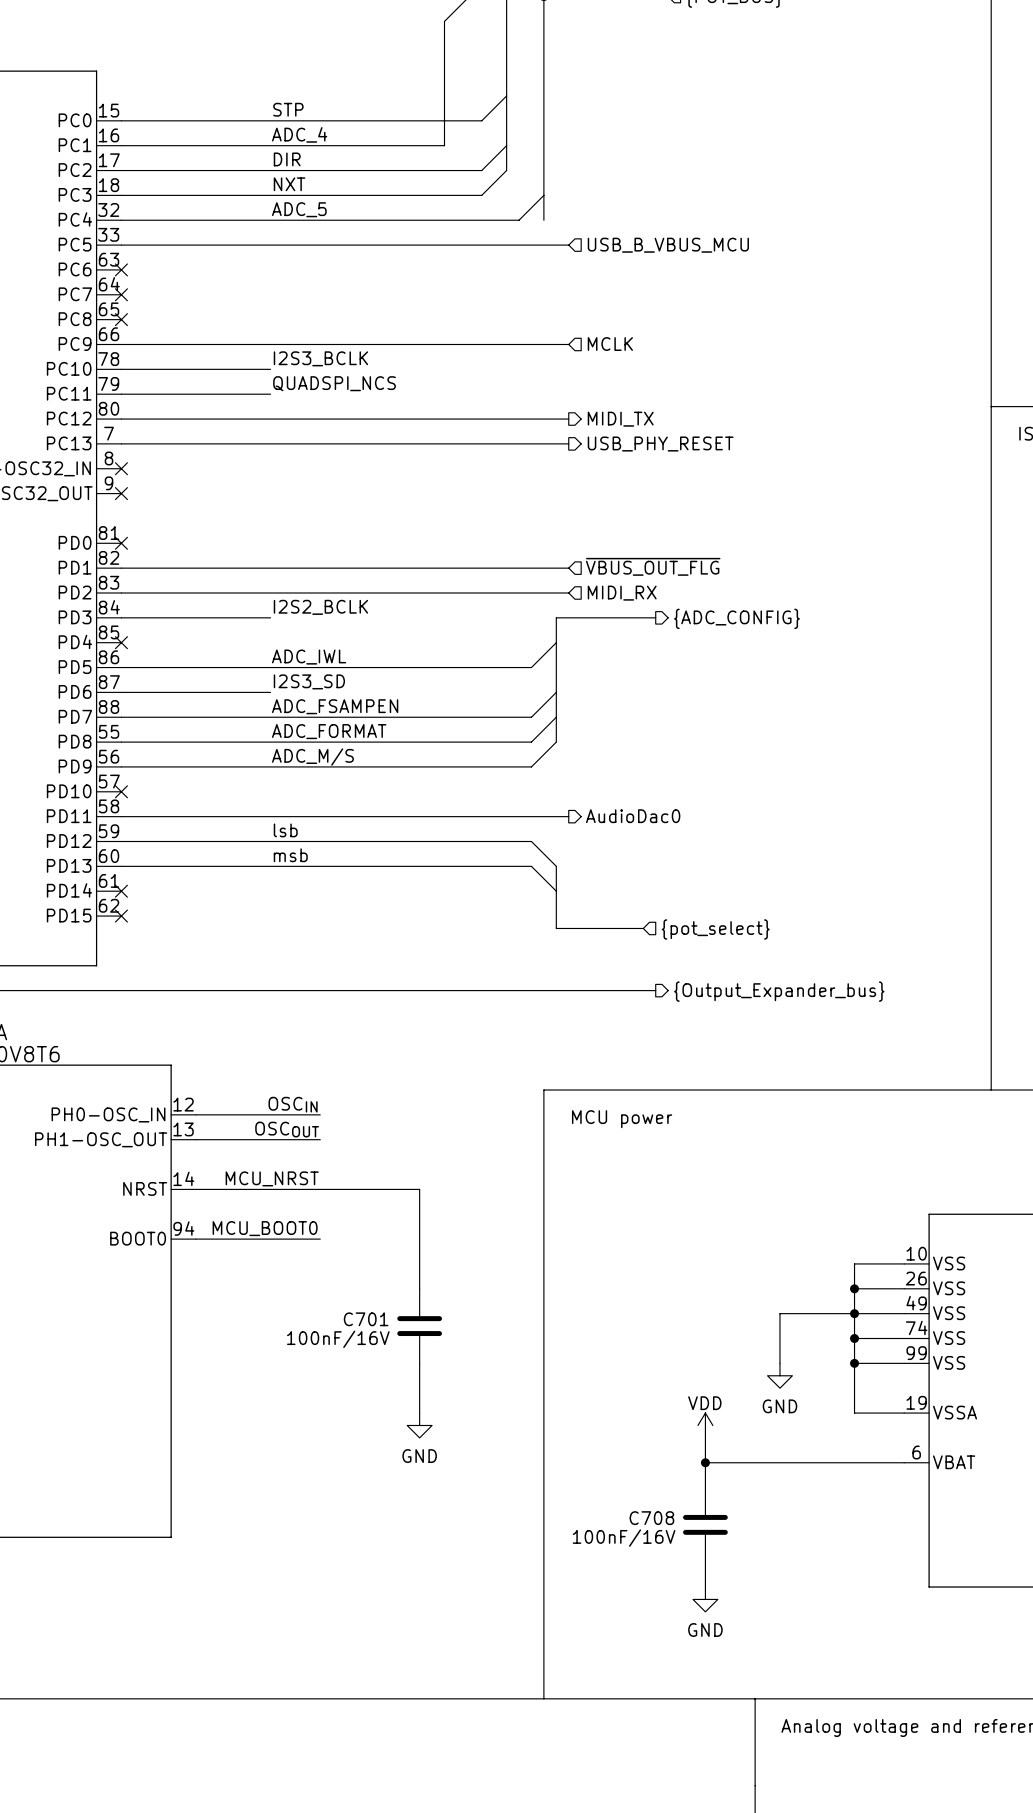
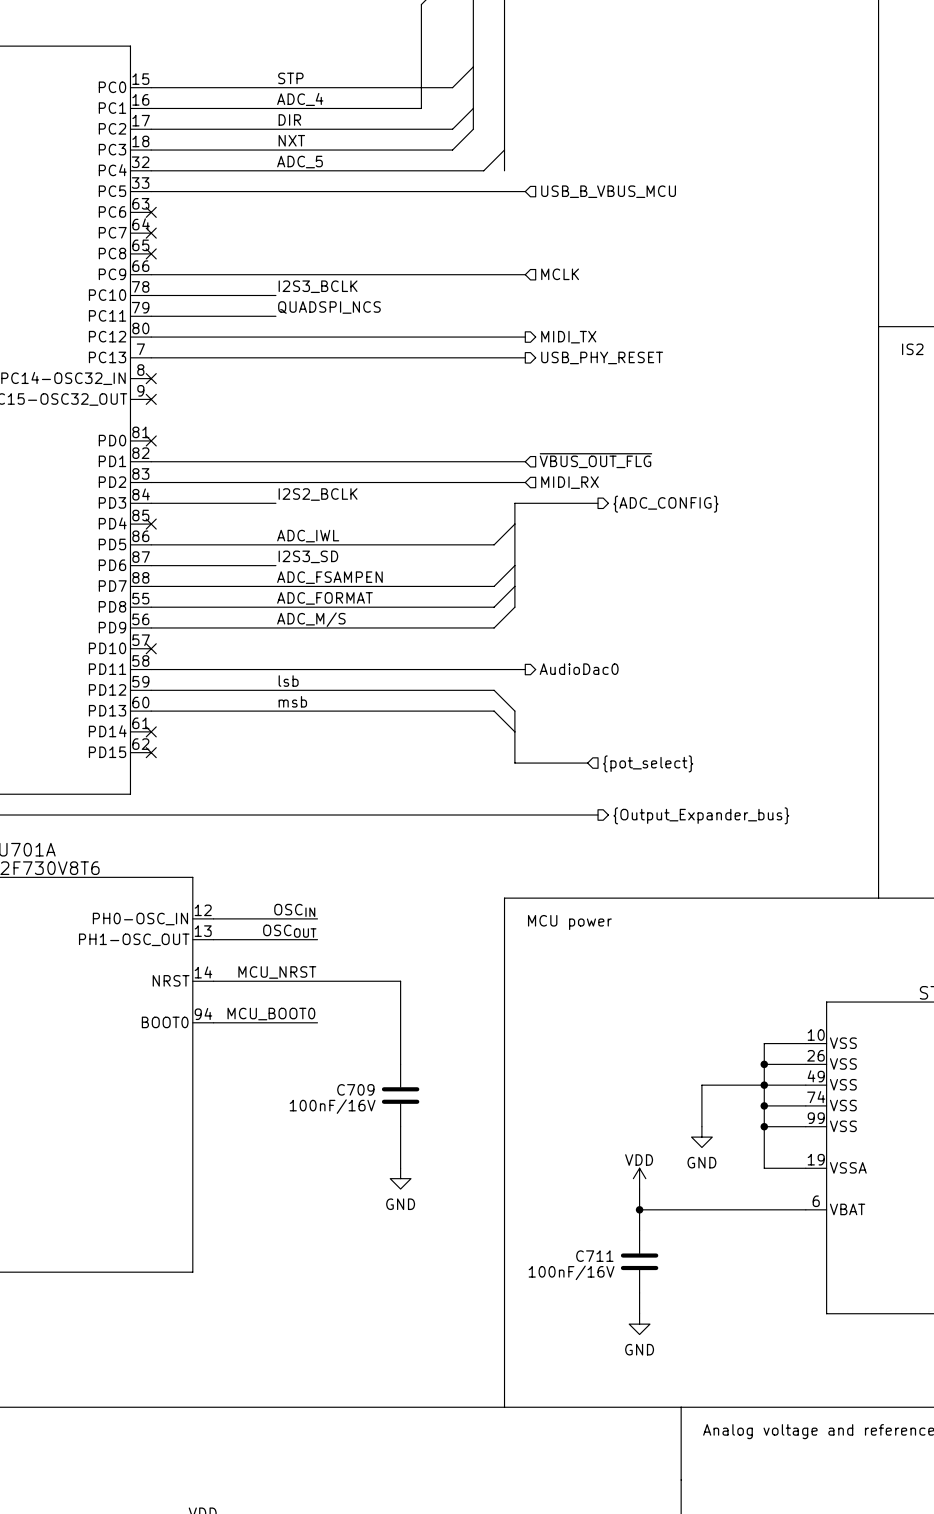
C701 name: C701 (366, 1319) -> C709 (355, 1089)
C708 name: C708 (651, 1518) -> C711 (594, 1256)

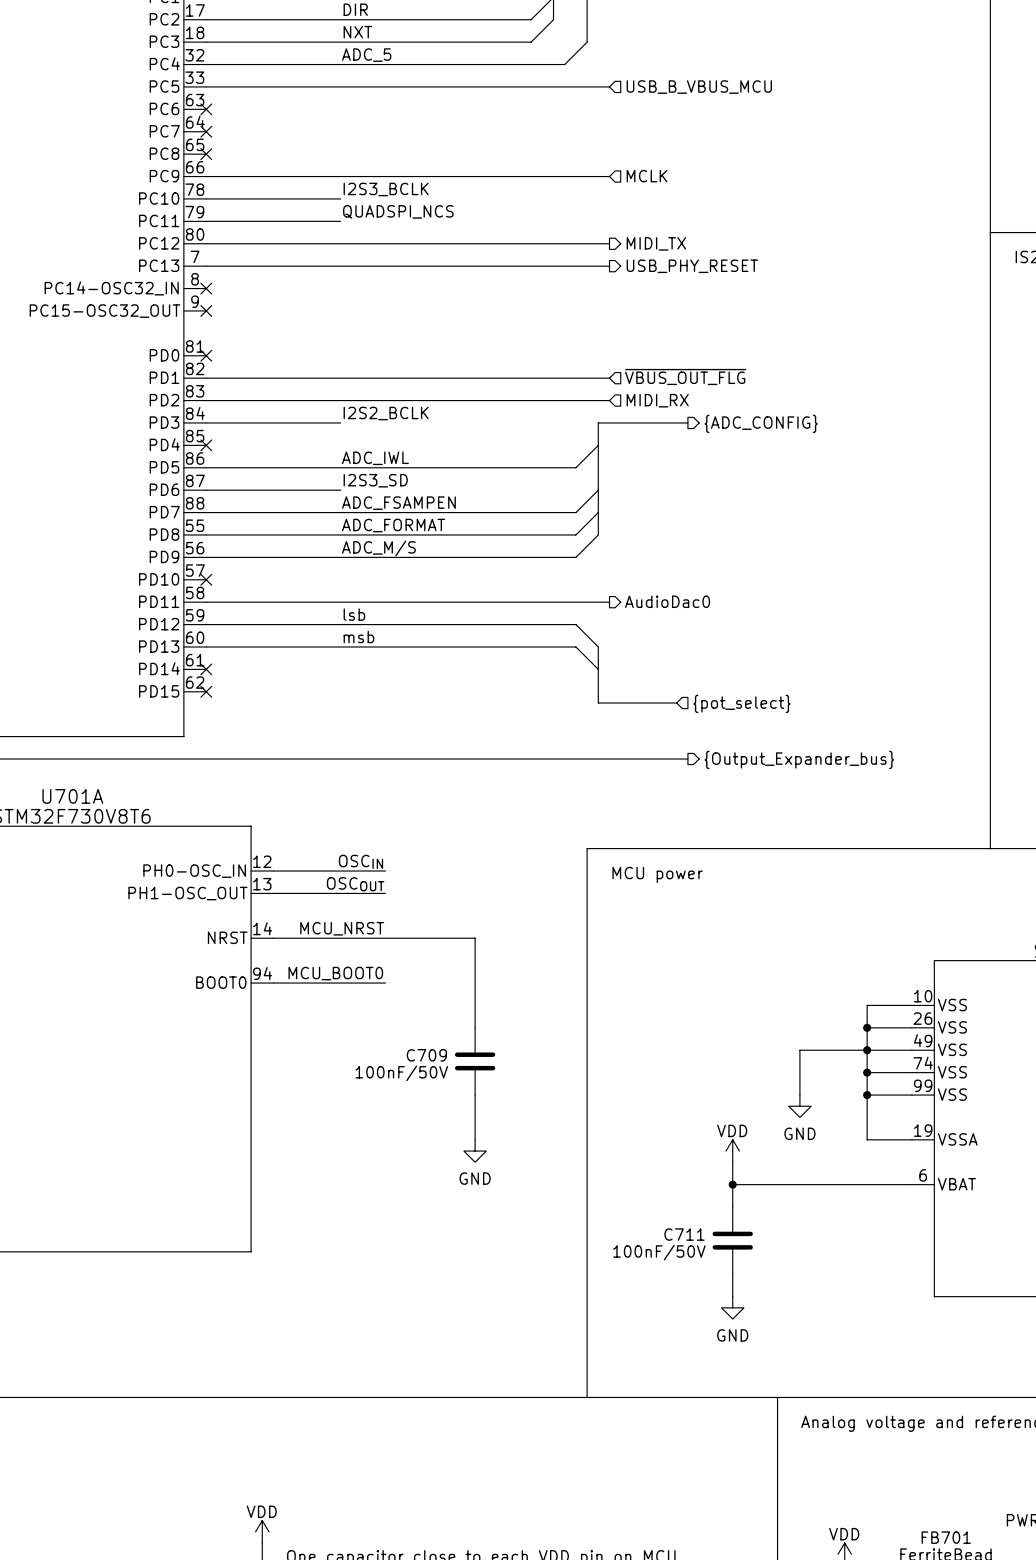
bus: (504, 150) (504, 170) -> none
C709 value: 100nF/16V (332, 1106) -> 100nF/50V (401, 1073)
C711 value: 100nF/16V (571, 1272) -> 100nF/50V (659, 1252)

